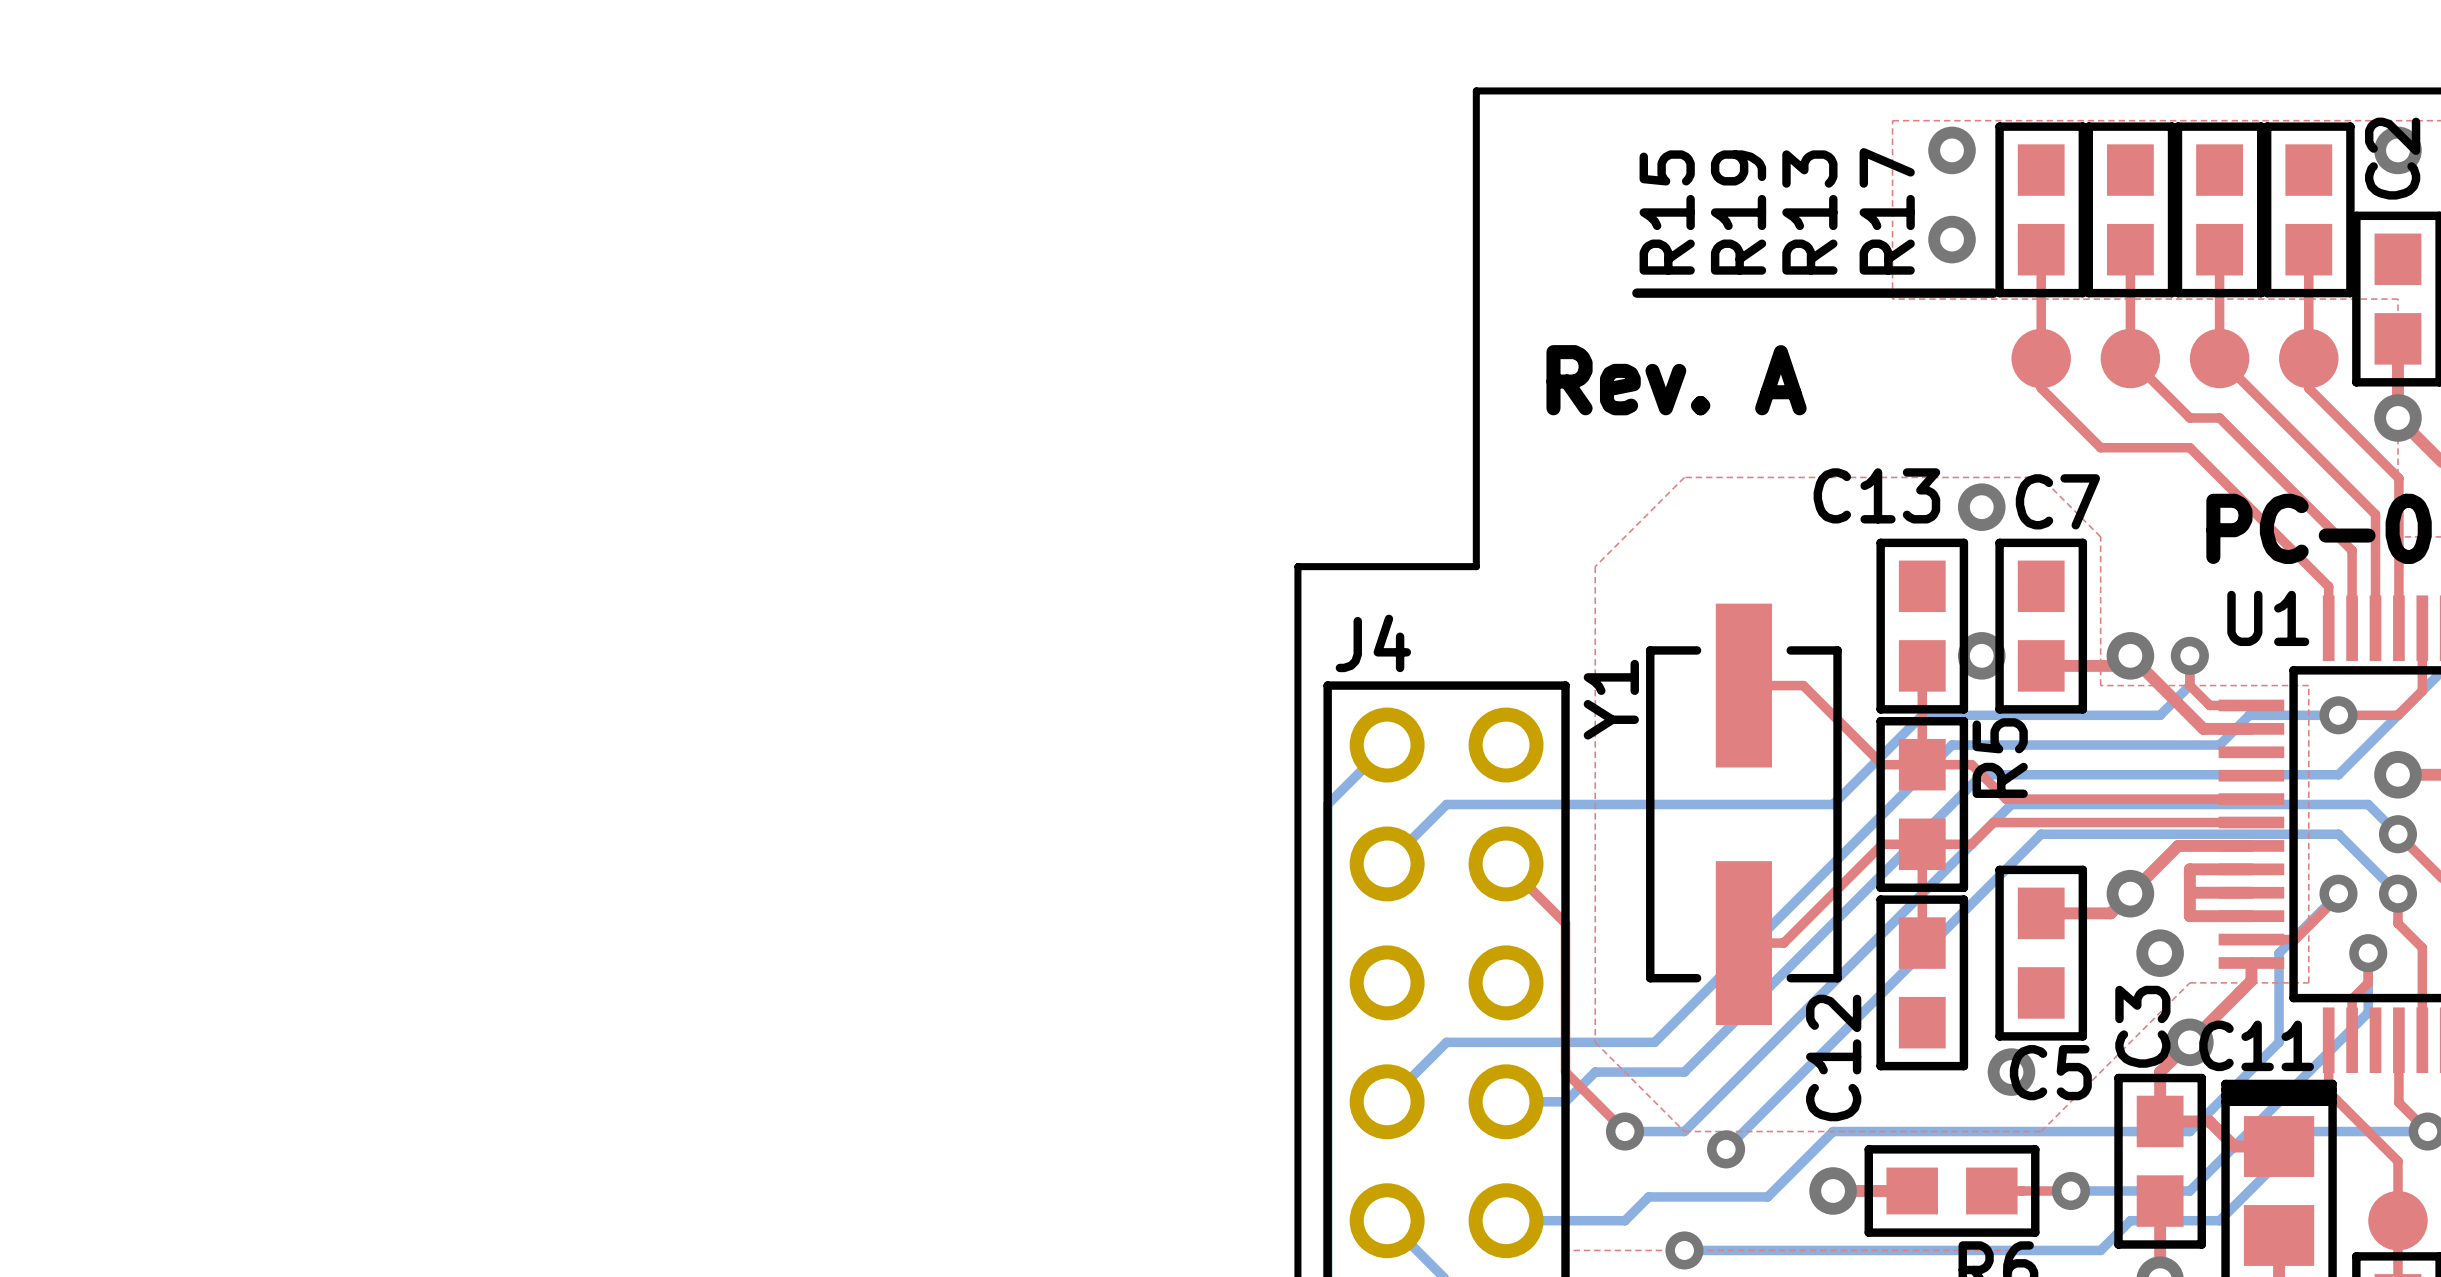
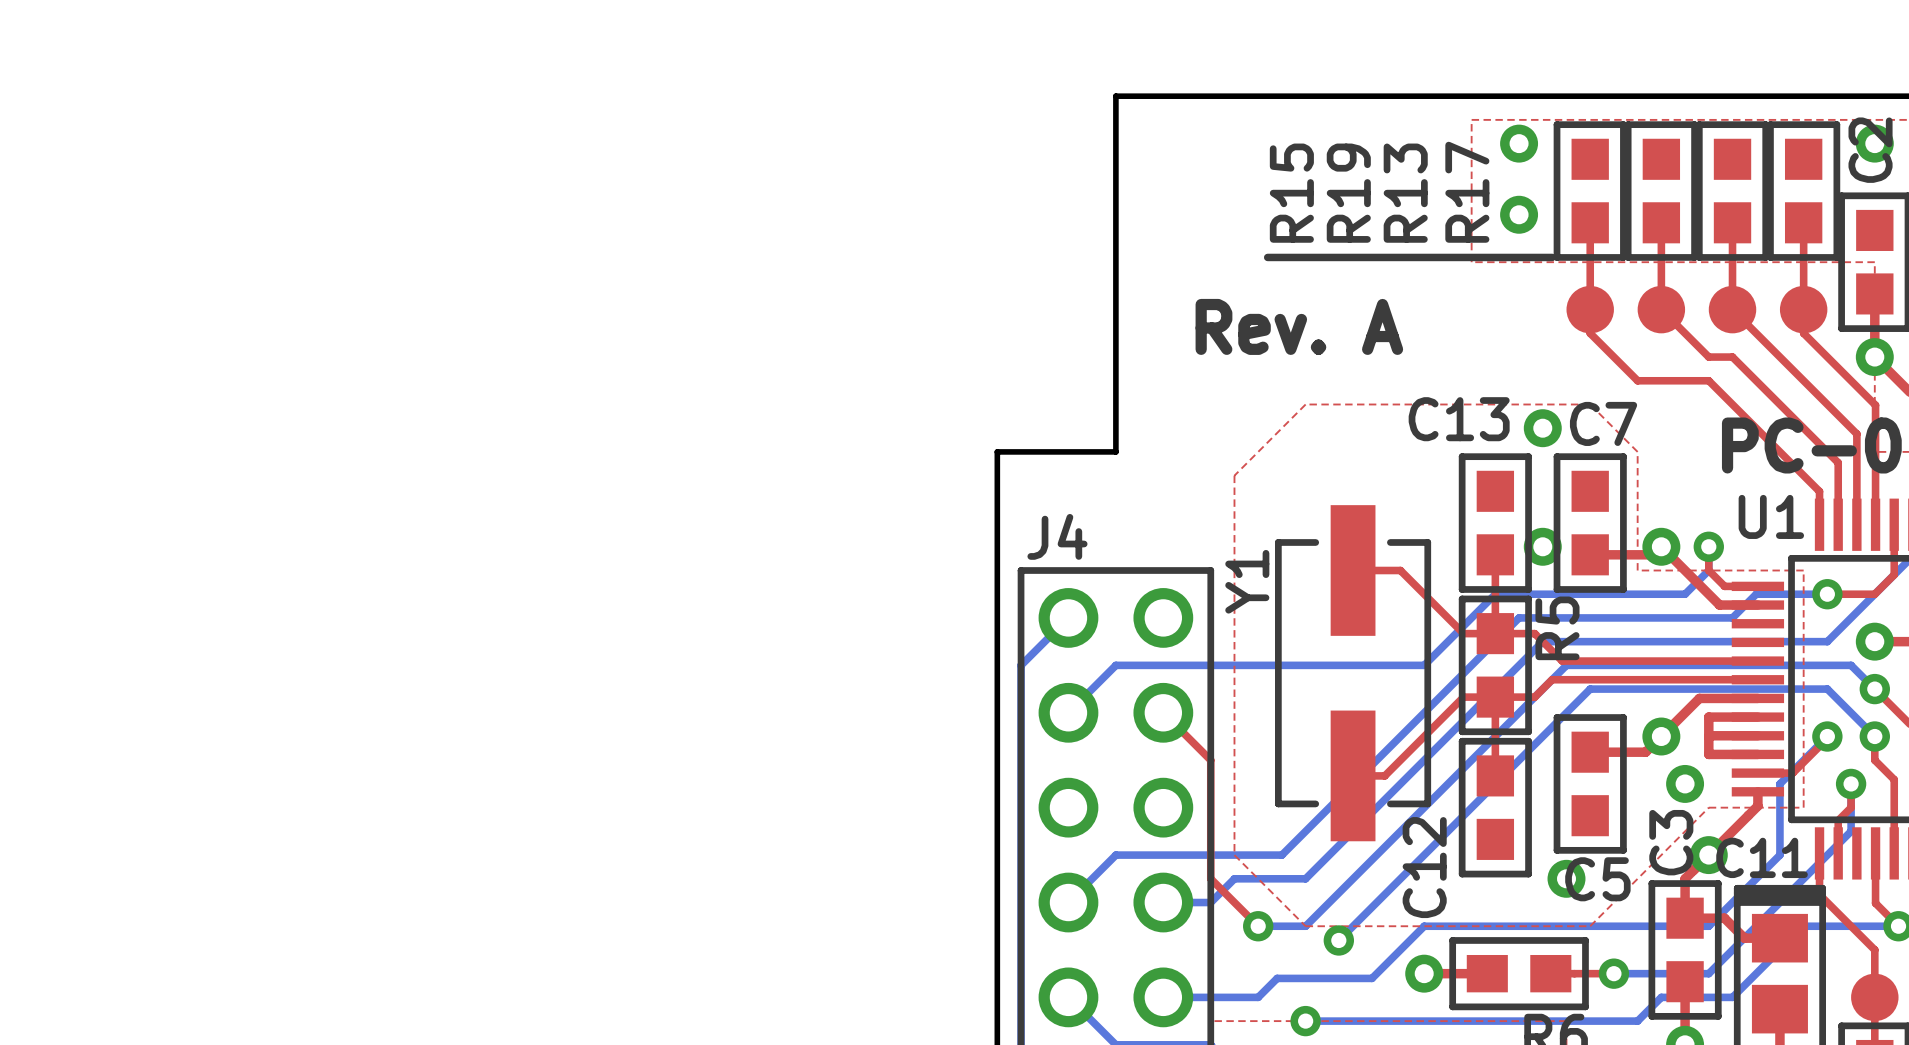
board edge: (1476, 90) (1476, 566) (1297, 566) -> (1139, 96) (1115, 96) (1115, 451) (997, 451) (997, 475)

